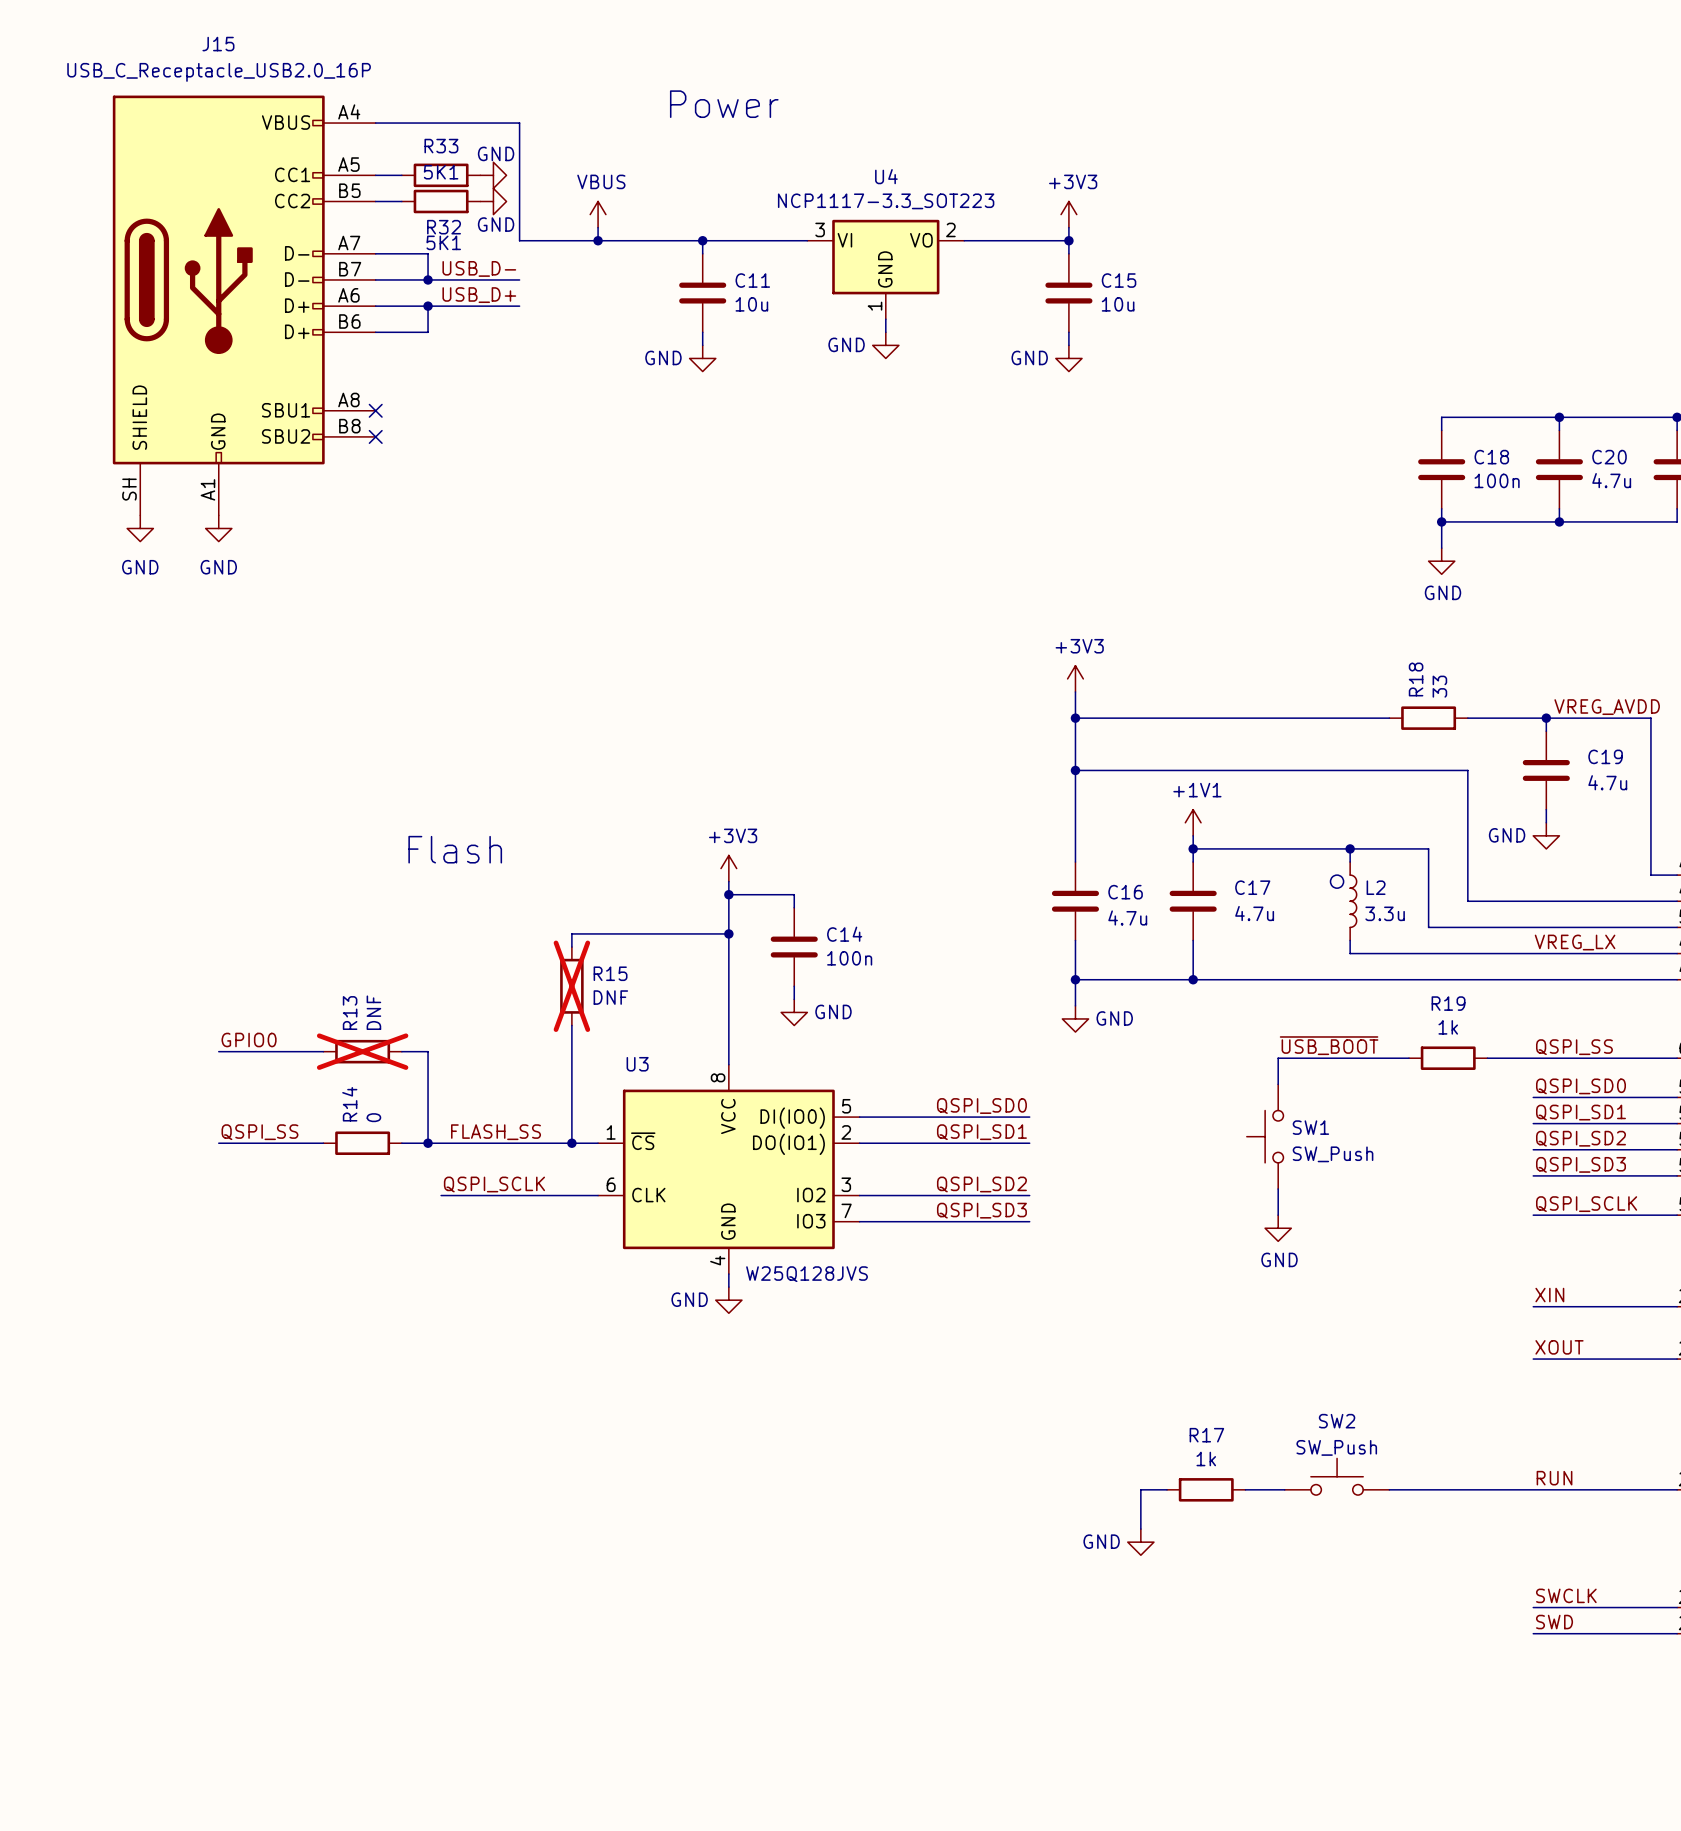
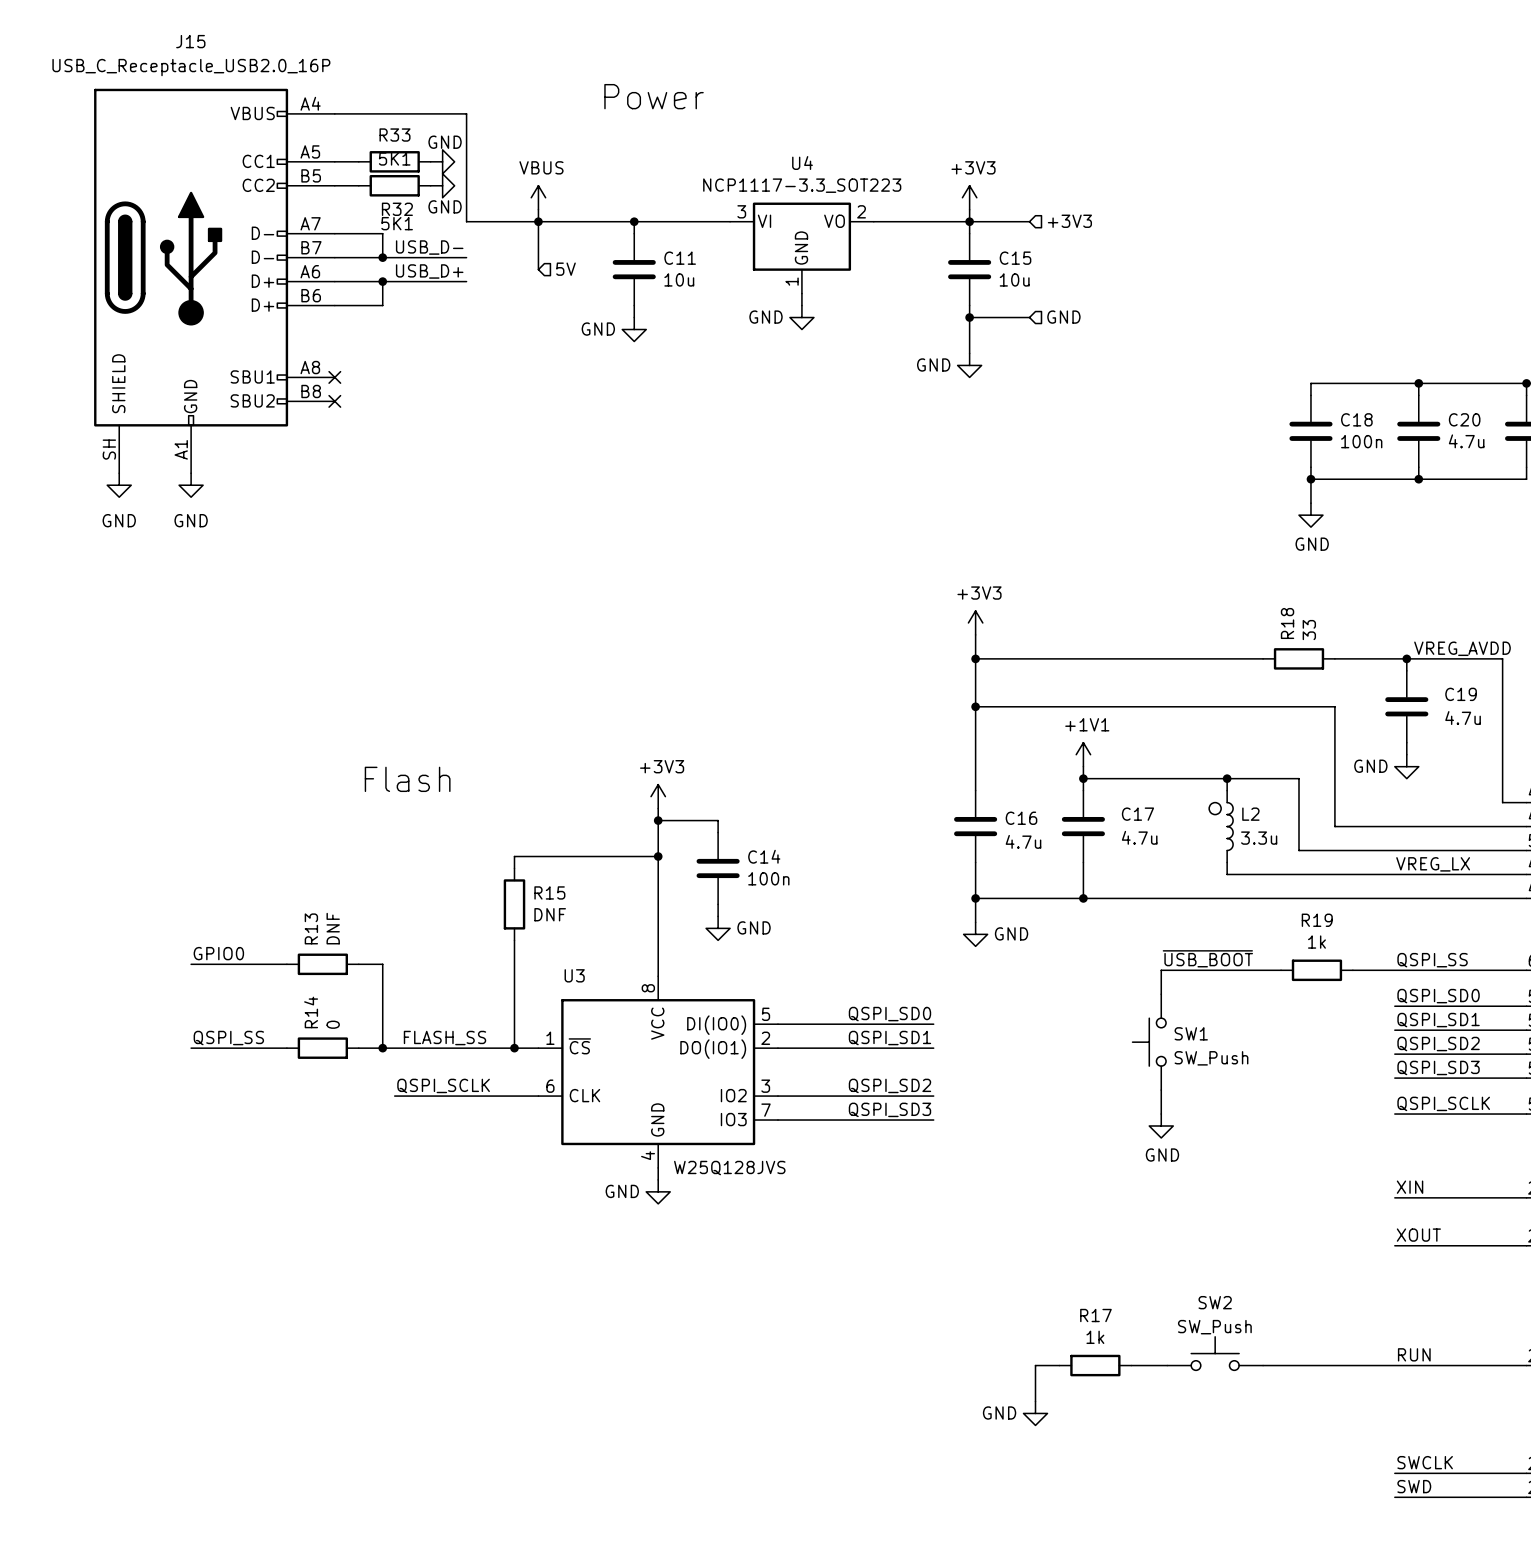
wire: none -> (538, 221) (538, 269)
wire: none -> (969, 221) (1029, 221)
hierarchical label: none -> +3V3 (1069, 221)
hierarchical label: none -> 5V (566, 269)
hierarchical label: none -> GND (1063, 317)
junction: none -> (969, 317)
wire: none -> (1029, 317) (969, 317) (969, 353)
power symbol position: GND (1068, 358) -> GND (969, 365)
R15 do-not-place cross: (571, 986) -> none
R13 do-not-place cross: (362, 1051) -> none

